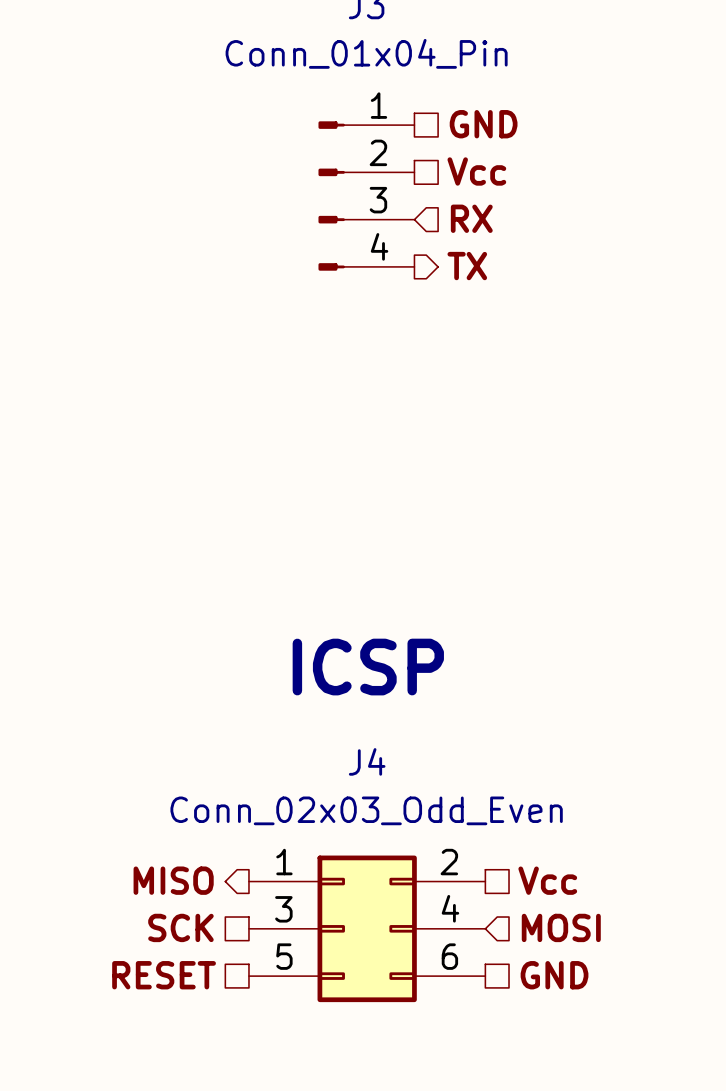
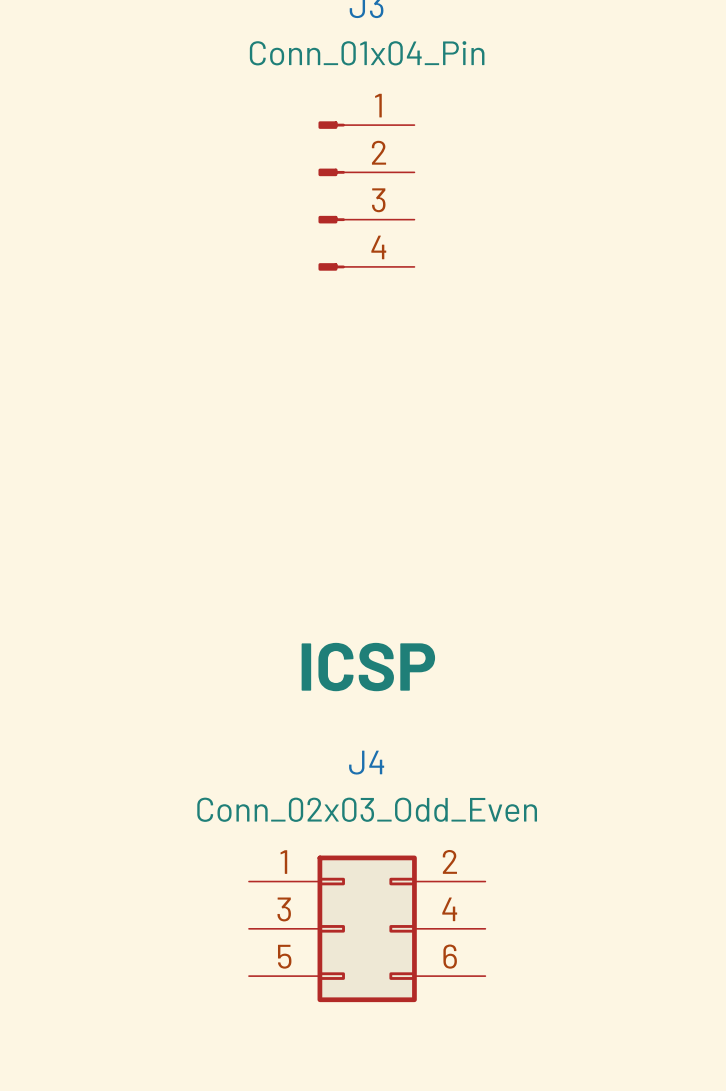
hierarchical label: GND (483, 124) -> none
hierarchical label: Vcc (476, 171) -> none
hierarchical label: RX (471, 218) -> none
hierarchical label: TX (467, 266) -> none
hierarchical label: MISO (173, 880) -> none
hierarchical label: Vcc (547, 880) -> none
hierarchical label: SCK (180, 927) -> none
hierarchical label: MOSI (561, 927) -> none
hierarchical label: RESET (164, 975) -> none
hierarchical label: GND (554, 975) -> none

